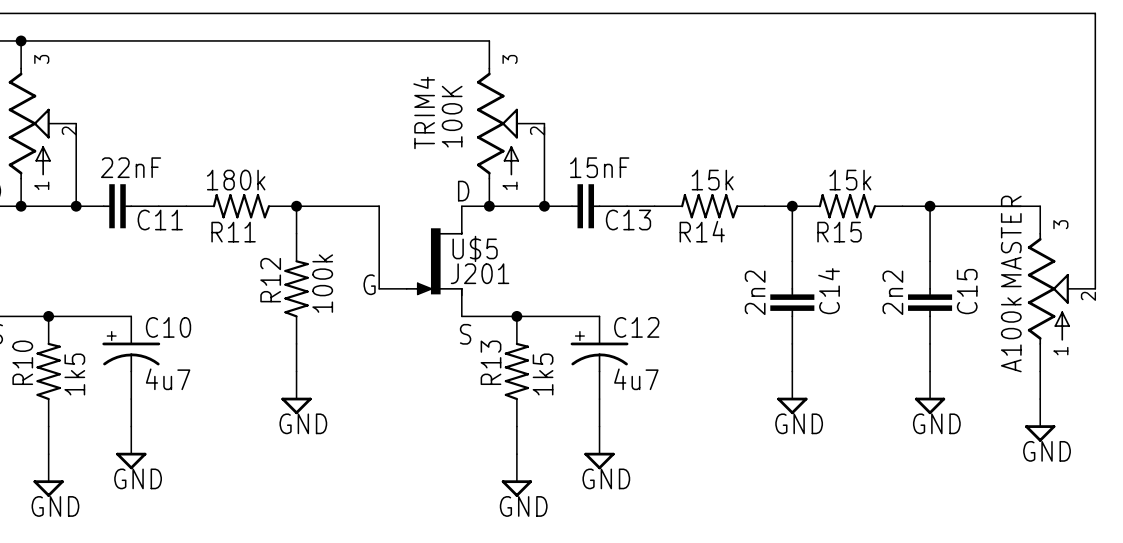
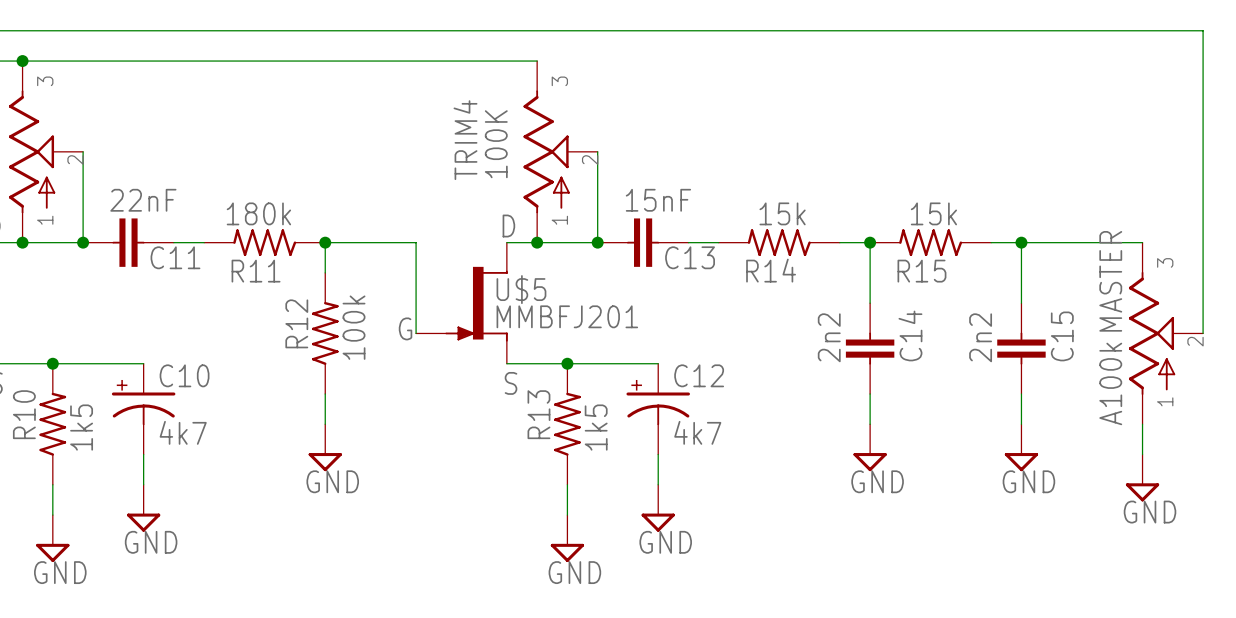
U$5 value: J201 (480, 273) -> MMBFJ201 (567, 316)
C10 value: 4u7 (168, 379) -> 4k7 (183, 432)
C12 value: 4u7 (636, 379) -> 4k7 (697, 432)

